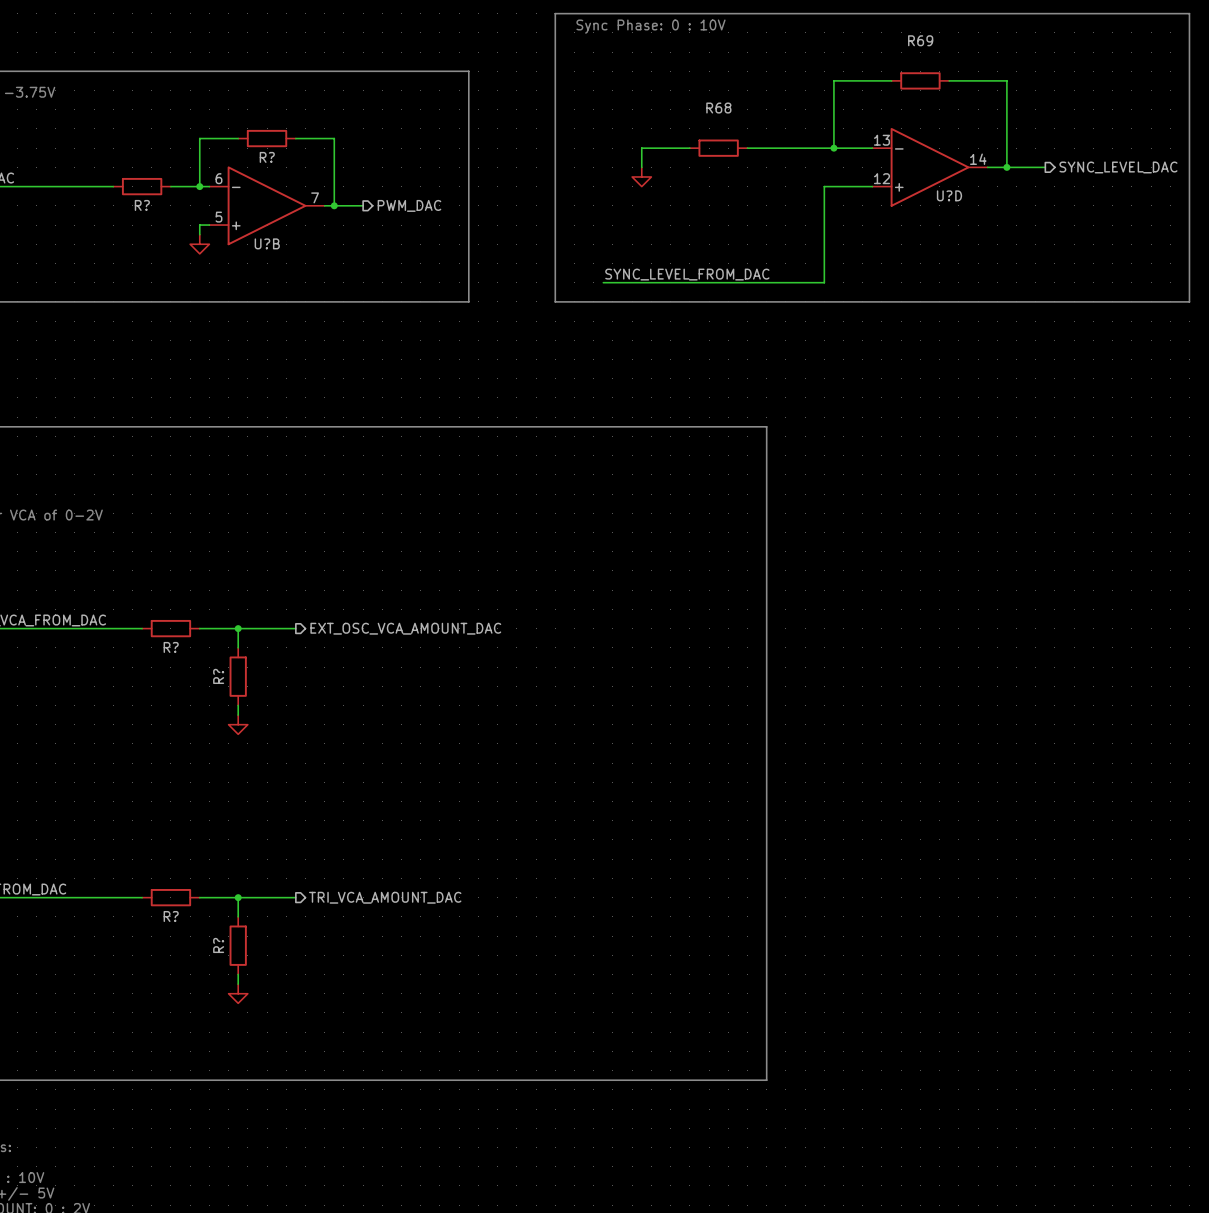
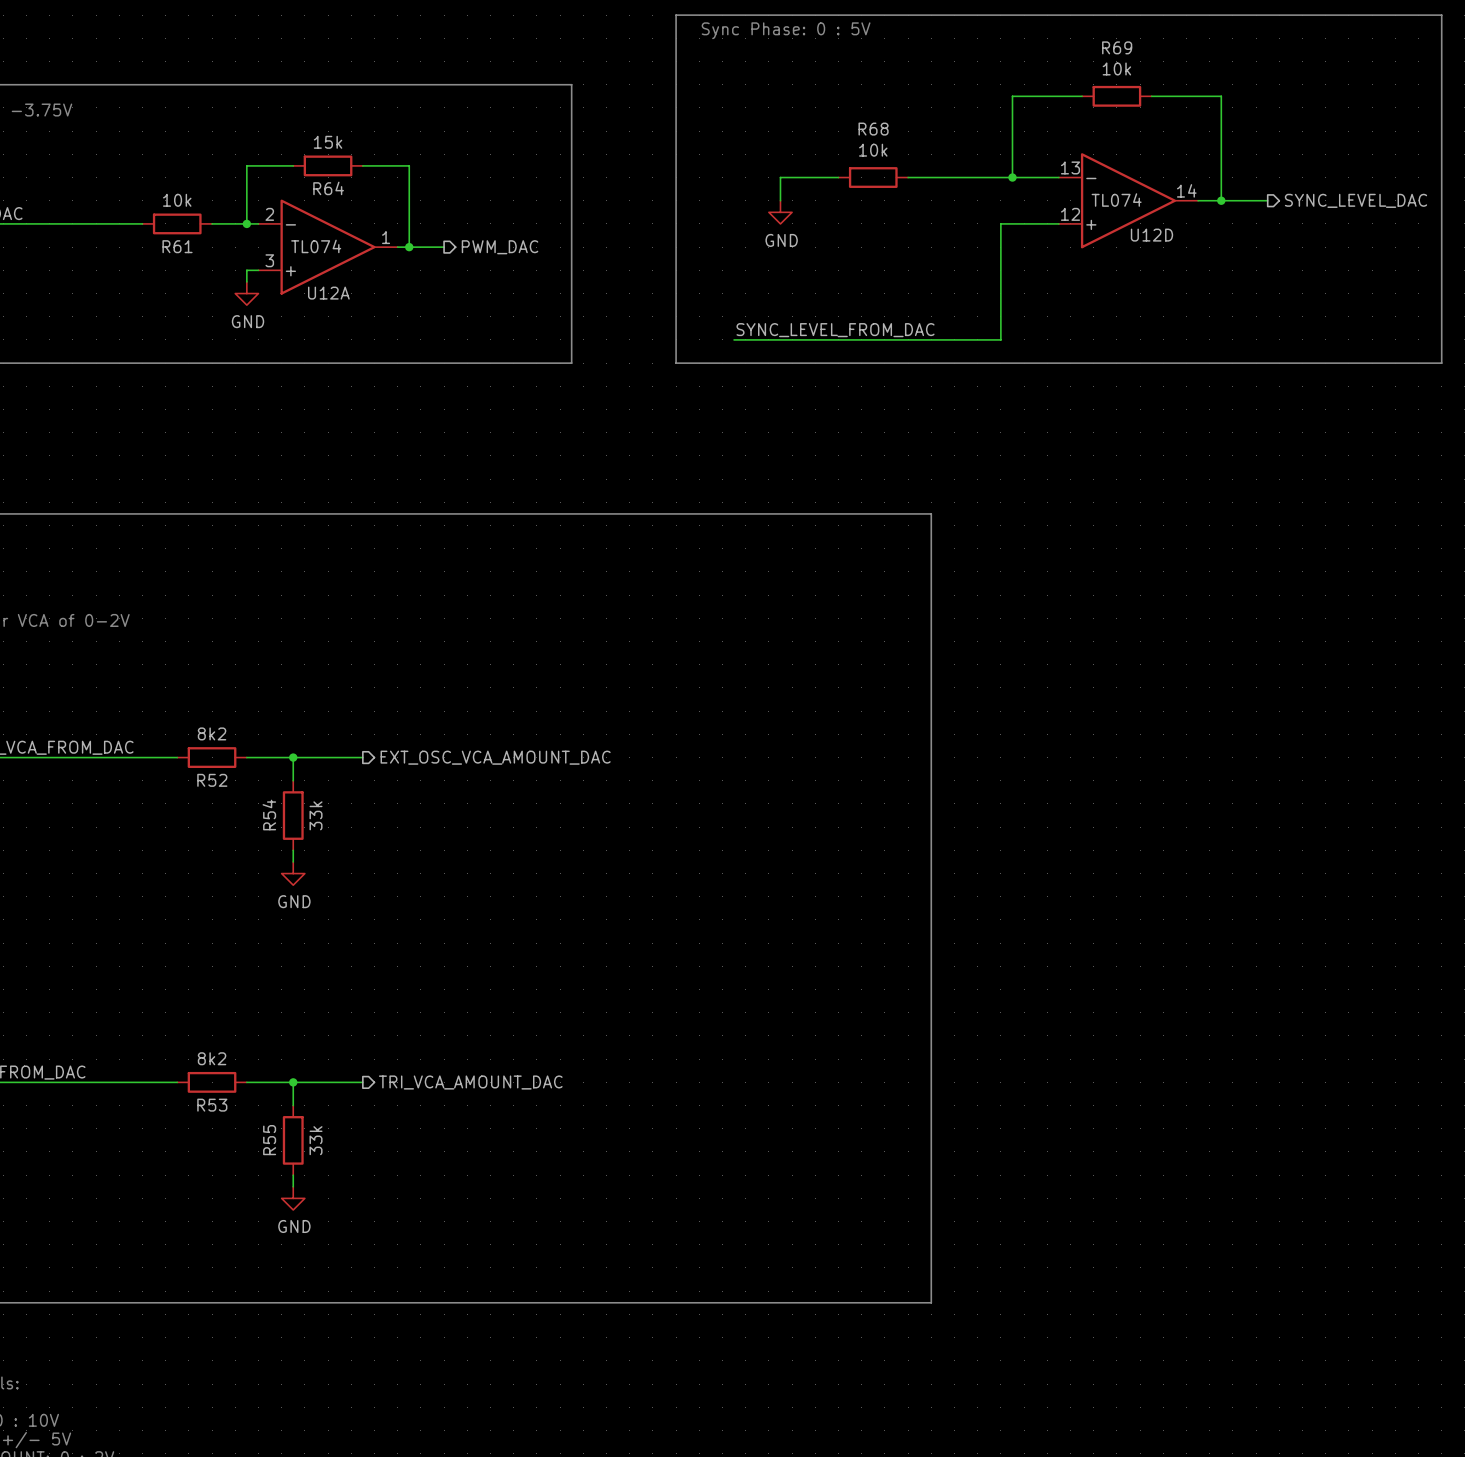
text: Sync Phase: 0 : 10V (650, 26) -> Sync Phase: 0 : 5V (786, 30)
R69 value: none -> 10k (1116, 68)
R? value: none -> 15k (328, 142)
R68 value: none -> 10k (873, 150)
R? name: R? (267, 157) -> R64 (328, 188)
U?D value: none -> TL074 (1116, 200)
R? value: none -> 10k (177, 200)
U?B pin number: 6 (218, 178) -> 2 (269, 214)
U?D name: U?D (949, 195) -> U12D (1151, 235)
U?B pin number: 7 (315, 197) -> 1 (386, 237)
power symbol text: none -> GND (781, 240)
R? name: R? (142, 205) -> R61 (177, 246)
U?B value: none -> TL074 (316, 246)
U?B pin number: 5 (218, 217) -> 3 (269, 260)
U?B name: U?B (267, 243) -> U12A (328, 293)
power symbol text: none -> GND (248, 321)
R? value: none -> 8k2 (212, 733)
R? name: R? (171, 647) -> R52 (212, 780)
R? name: R? (218, 676) -> R54 (269, 815)
R? value: none -> 33k (316, 815)
power symbol text: none -> GND (294, 901)
R? value: none -> 8k2 (212, 1058)
R? name: R? (171, 916) -> R53 (212, 1105)
R? name: R? (218, 945) -> R55 (269, 1140)
R? value: none -> 33k (316, 1140)
power symbol text: none -> GND (294, 1226)

